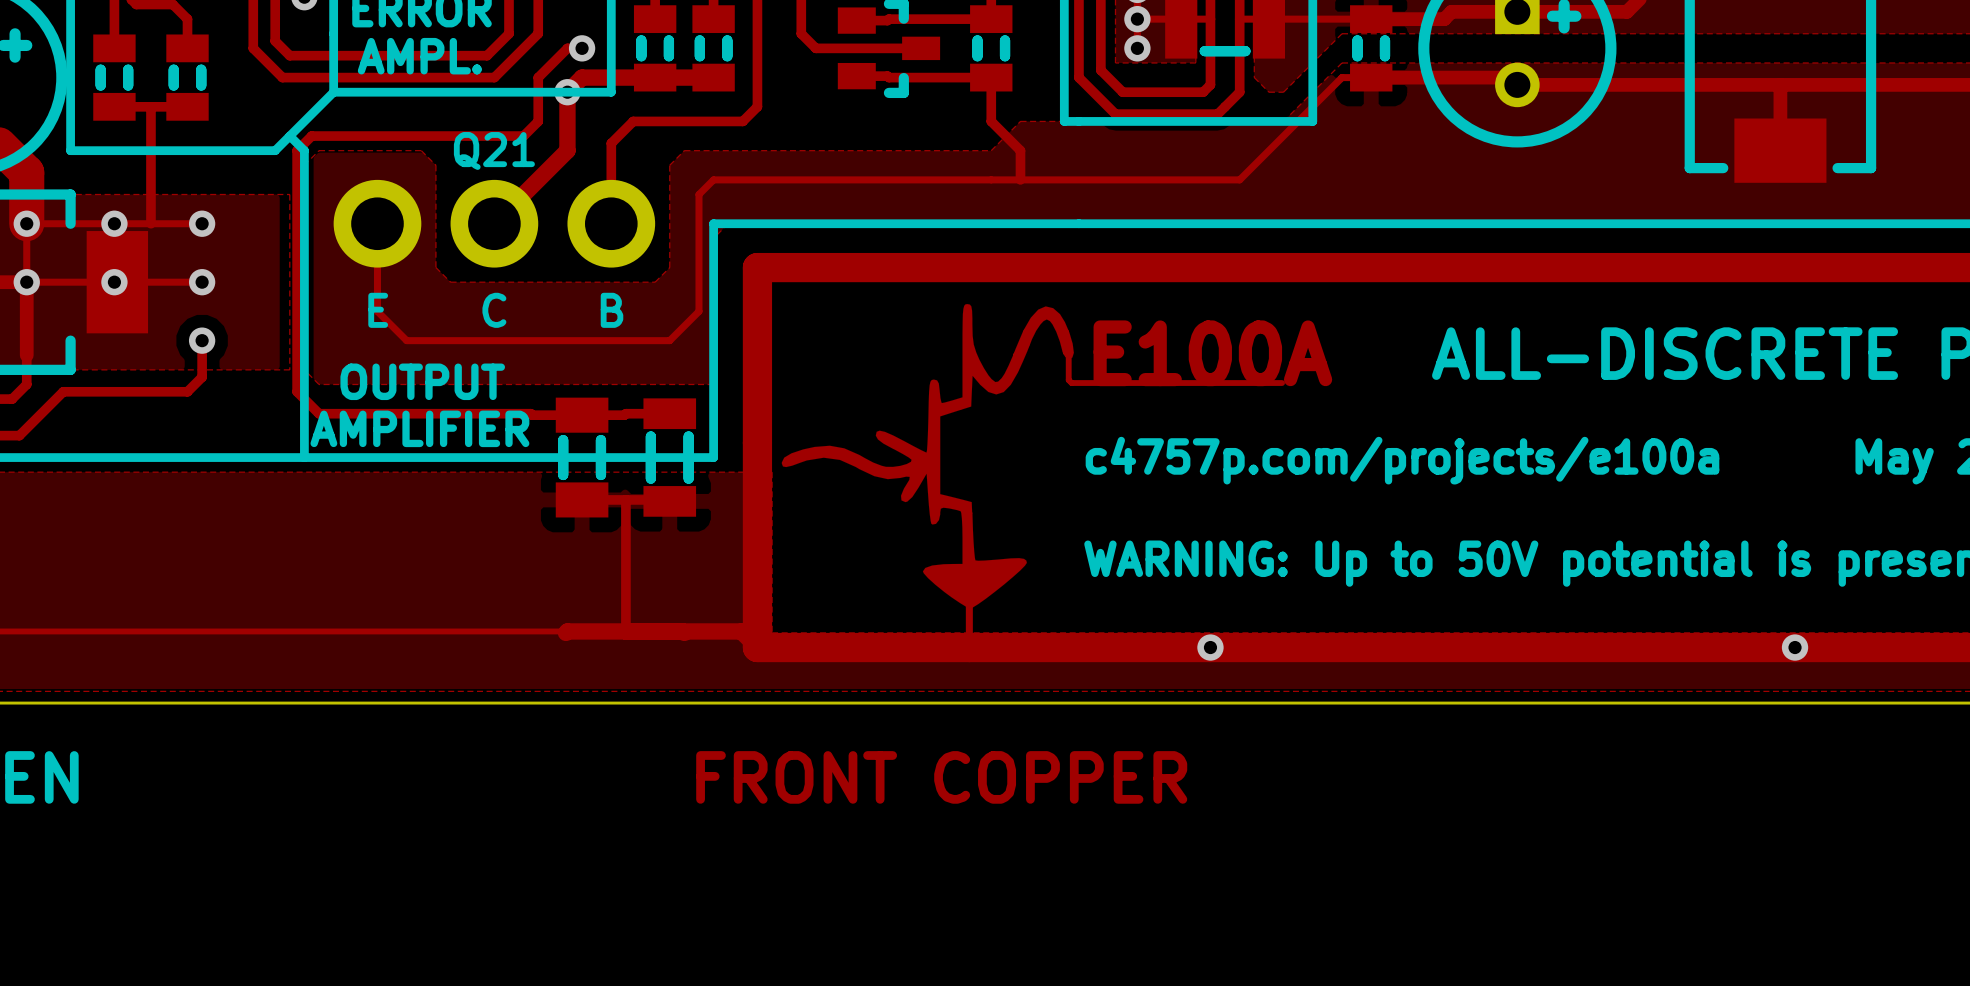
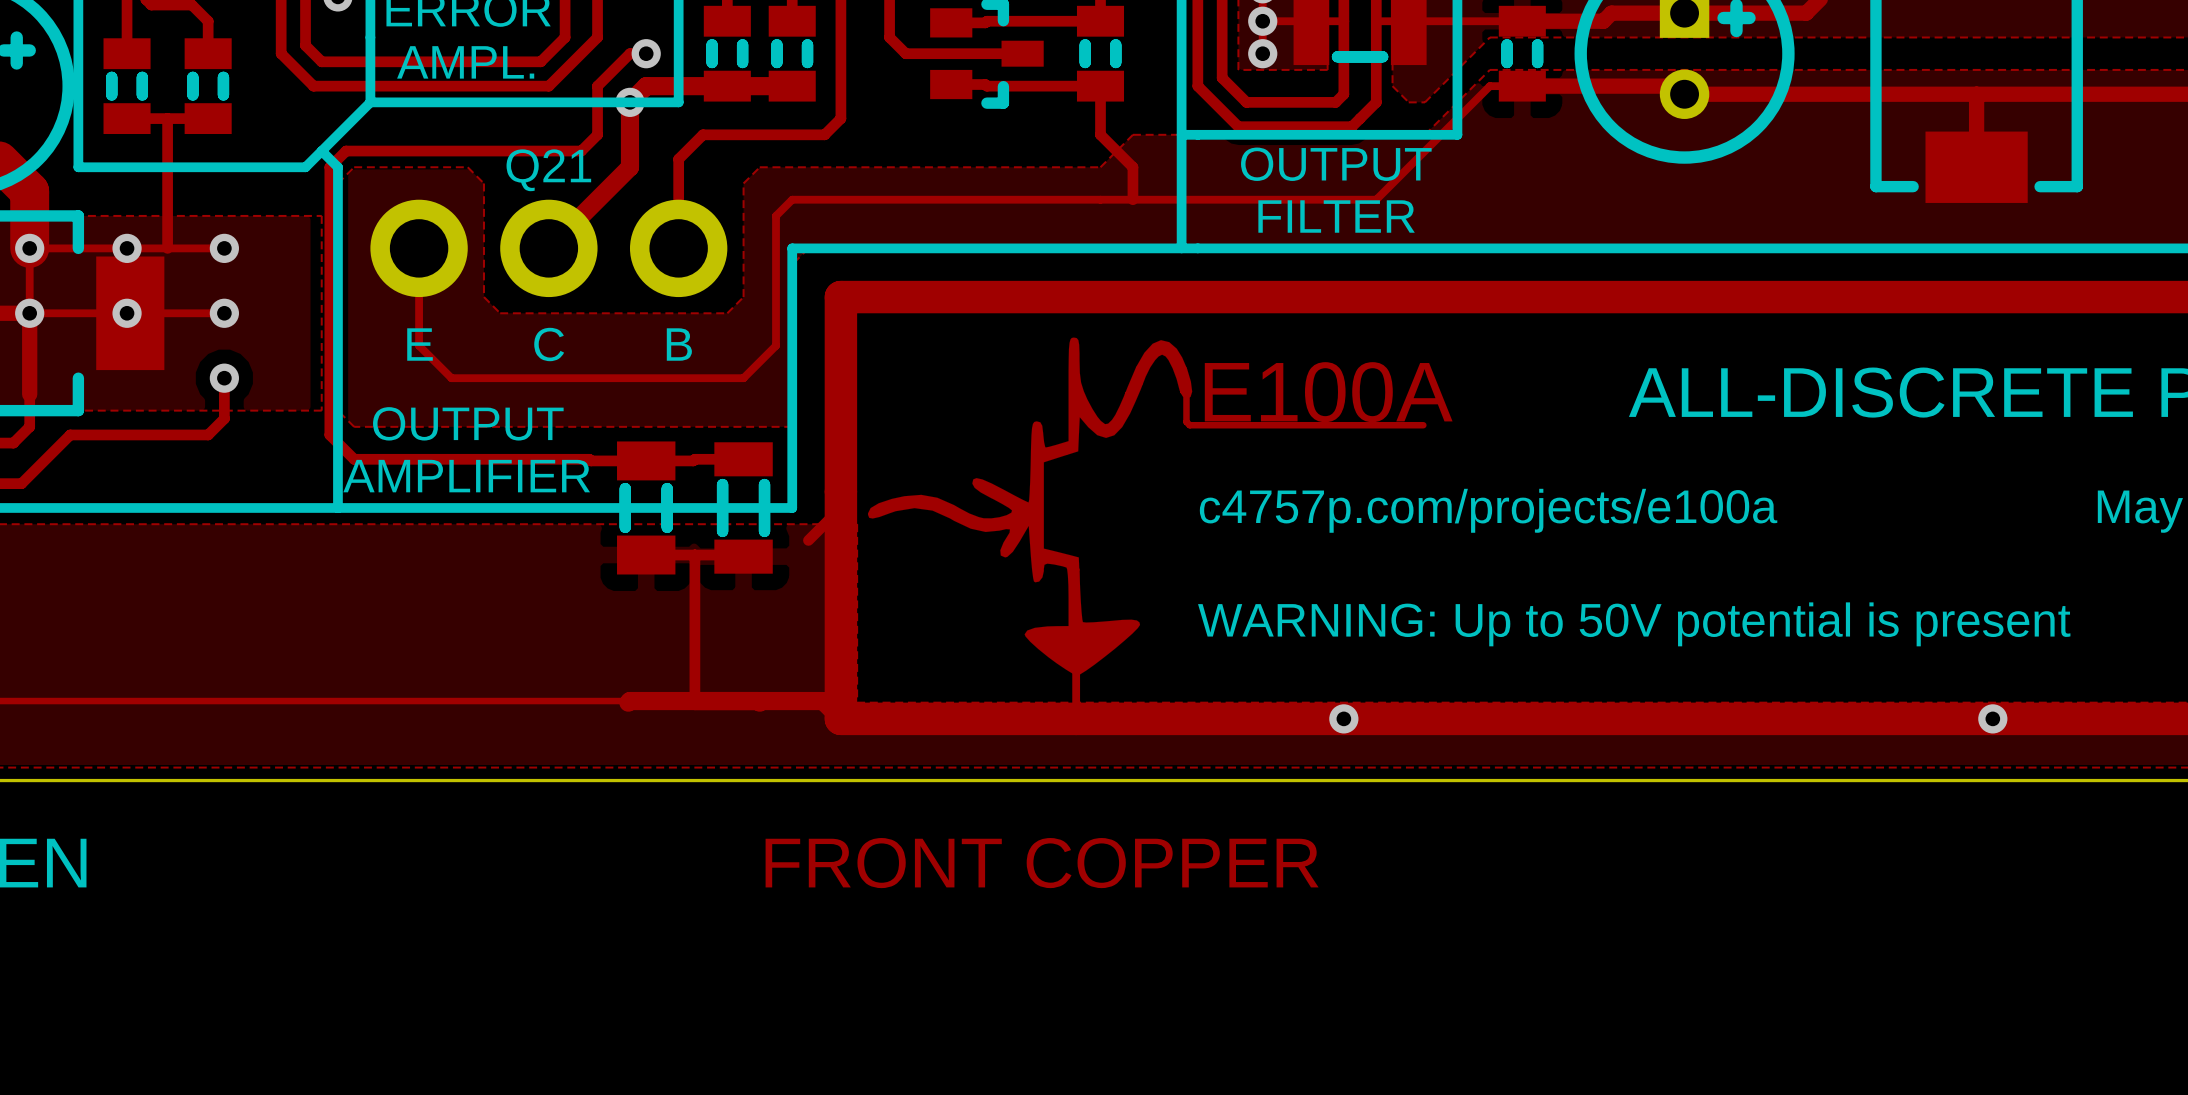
line: none -> (1181, 134) (1181, 248)
text: none -> OUTPUT (1336, 164)
text: none -> FILTER (1336, 216)
track: none -> (840, 507) (808, 540)

